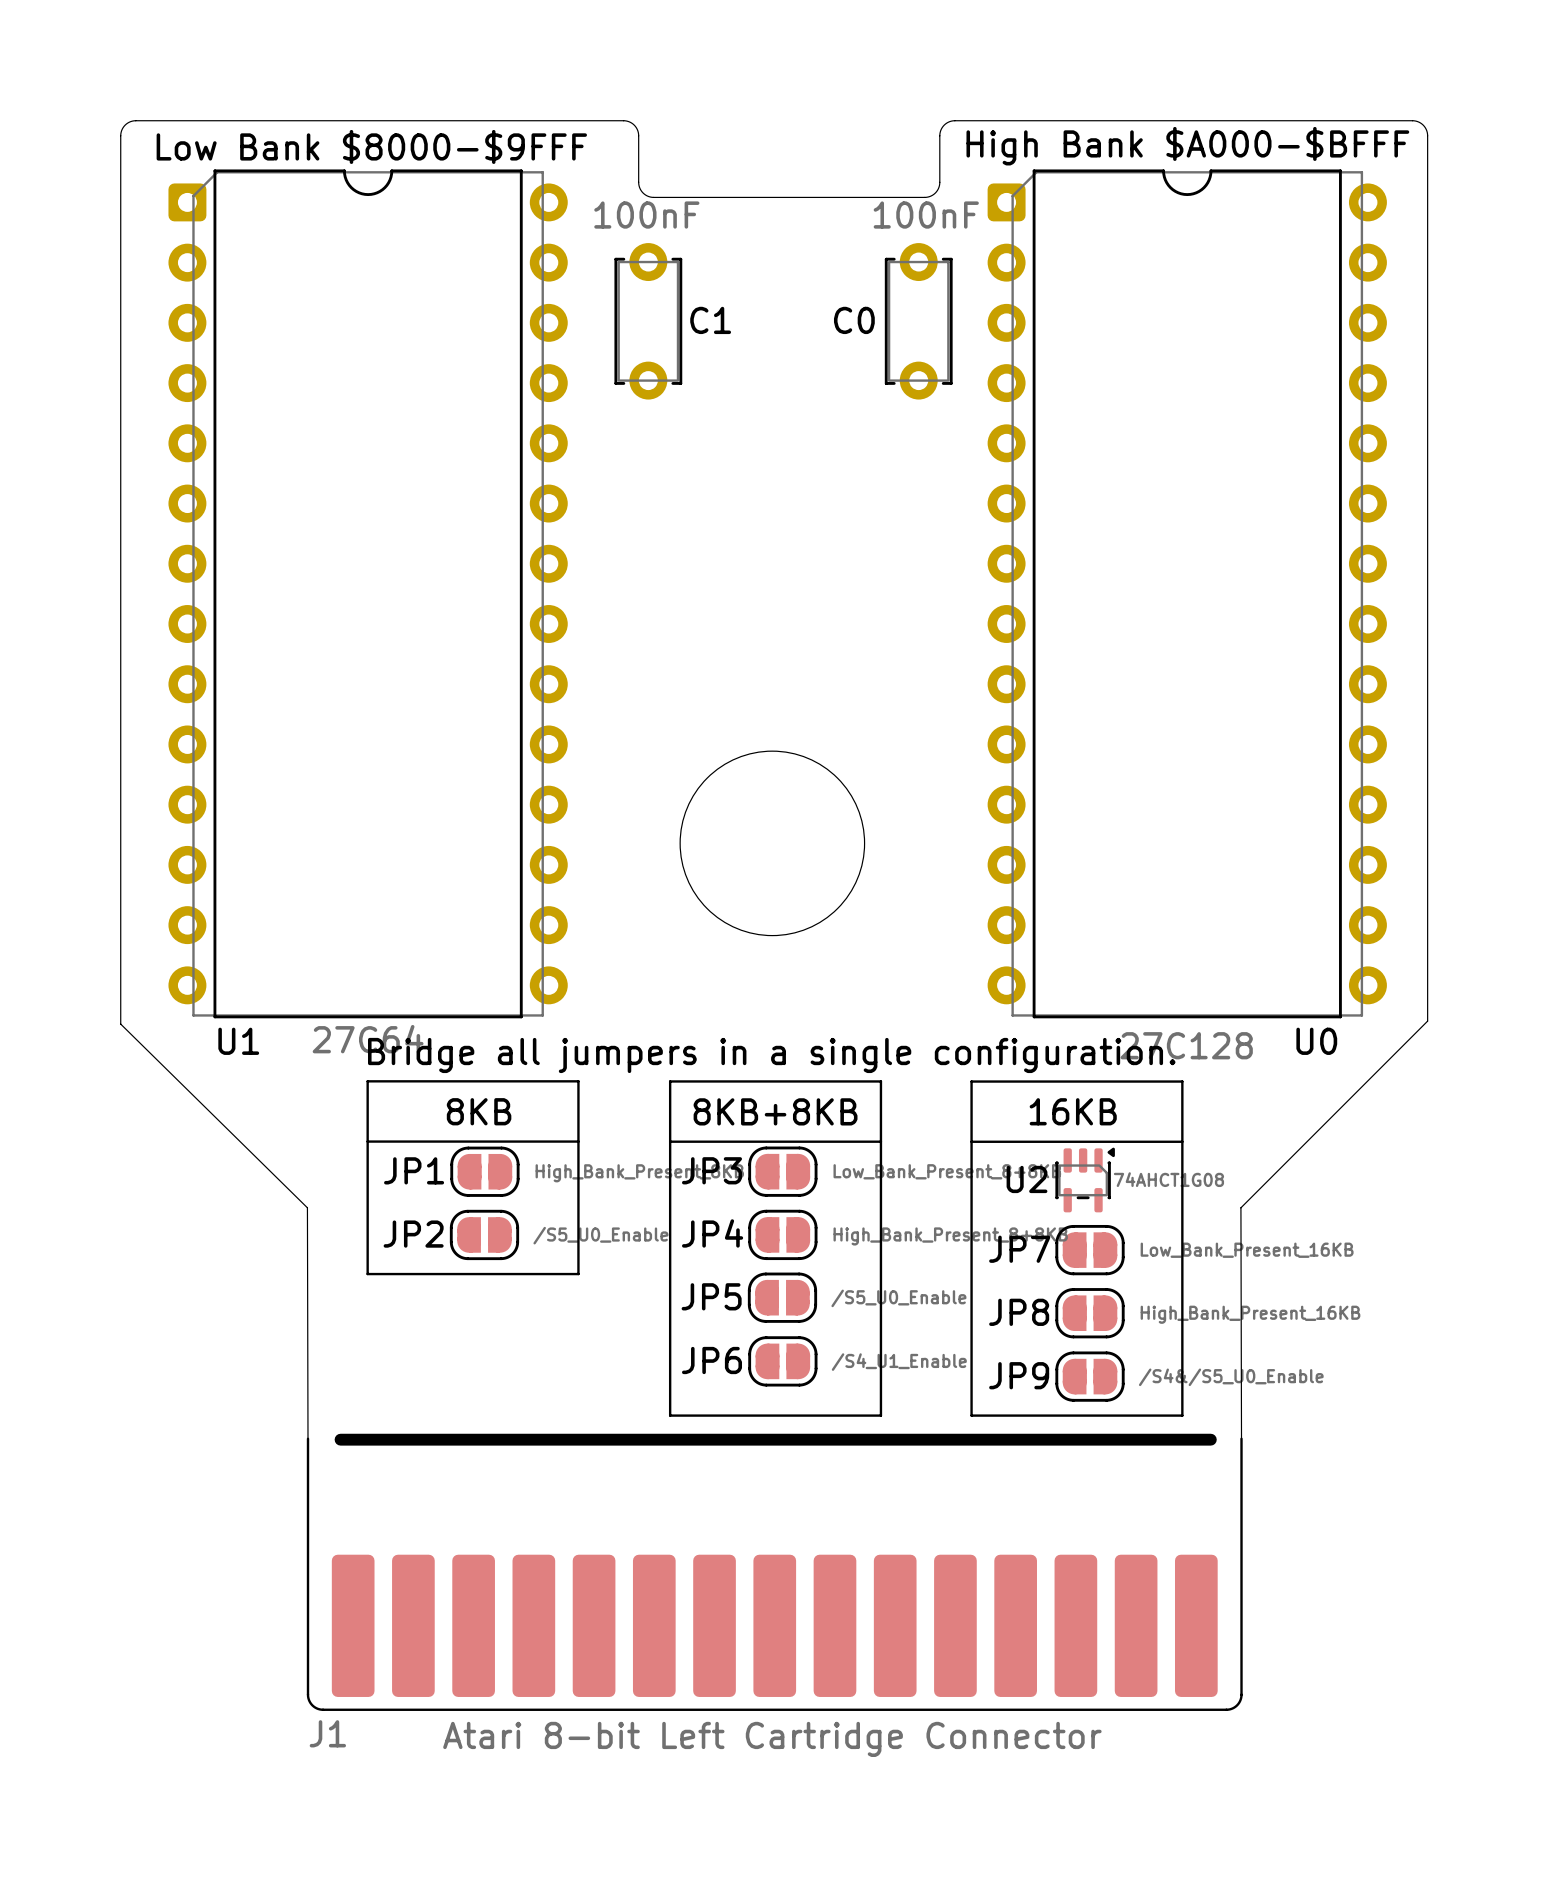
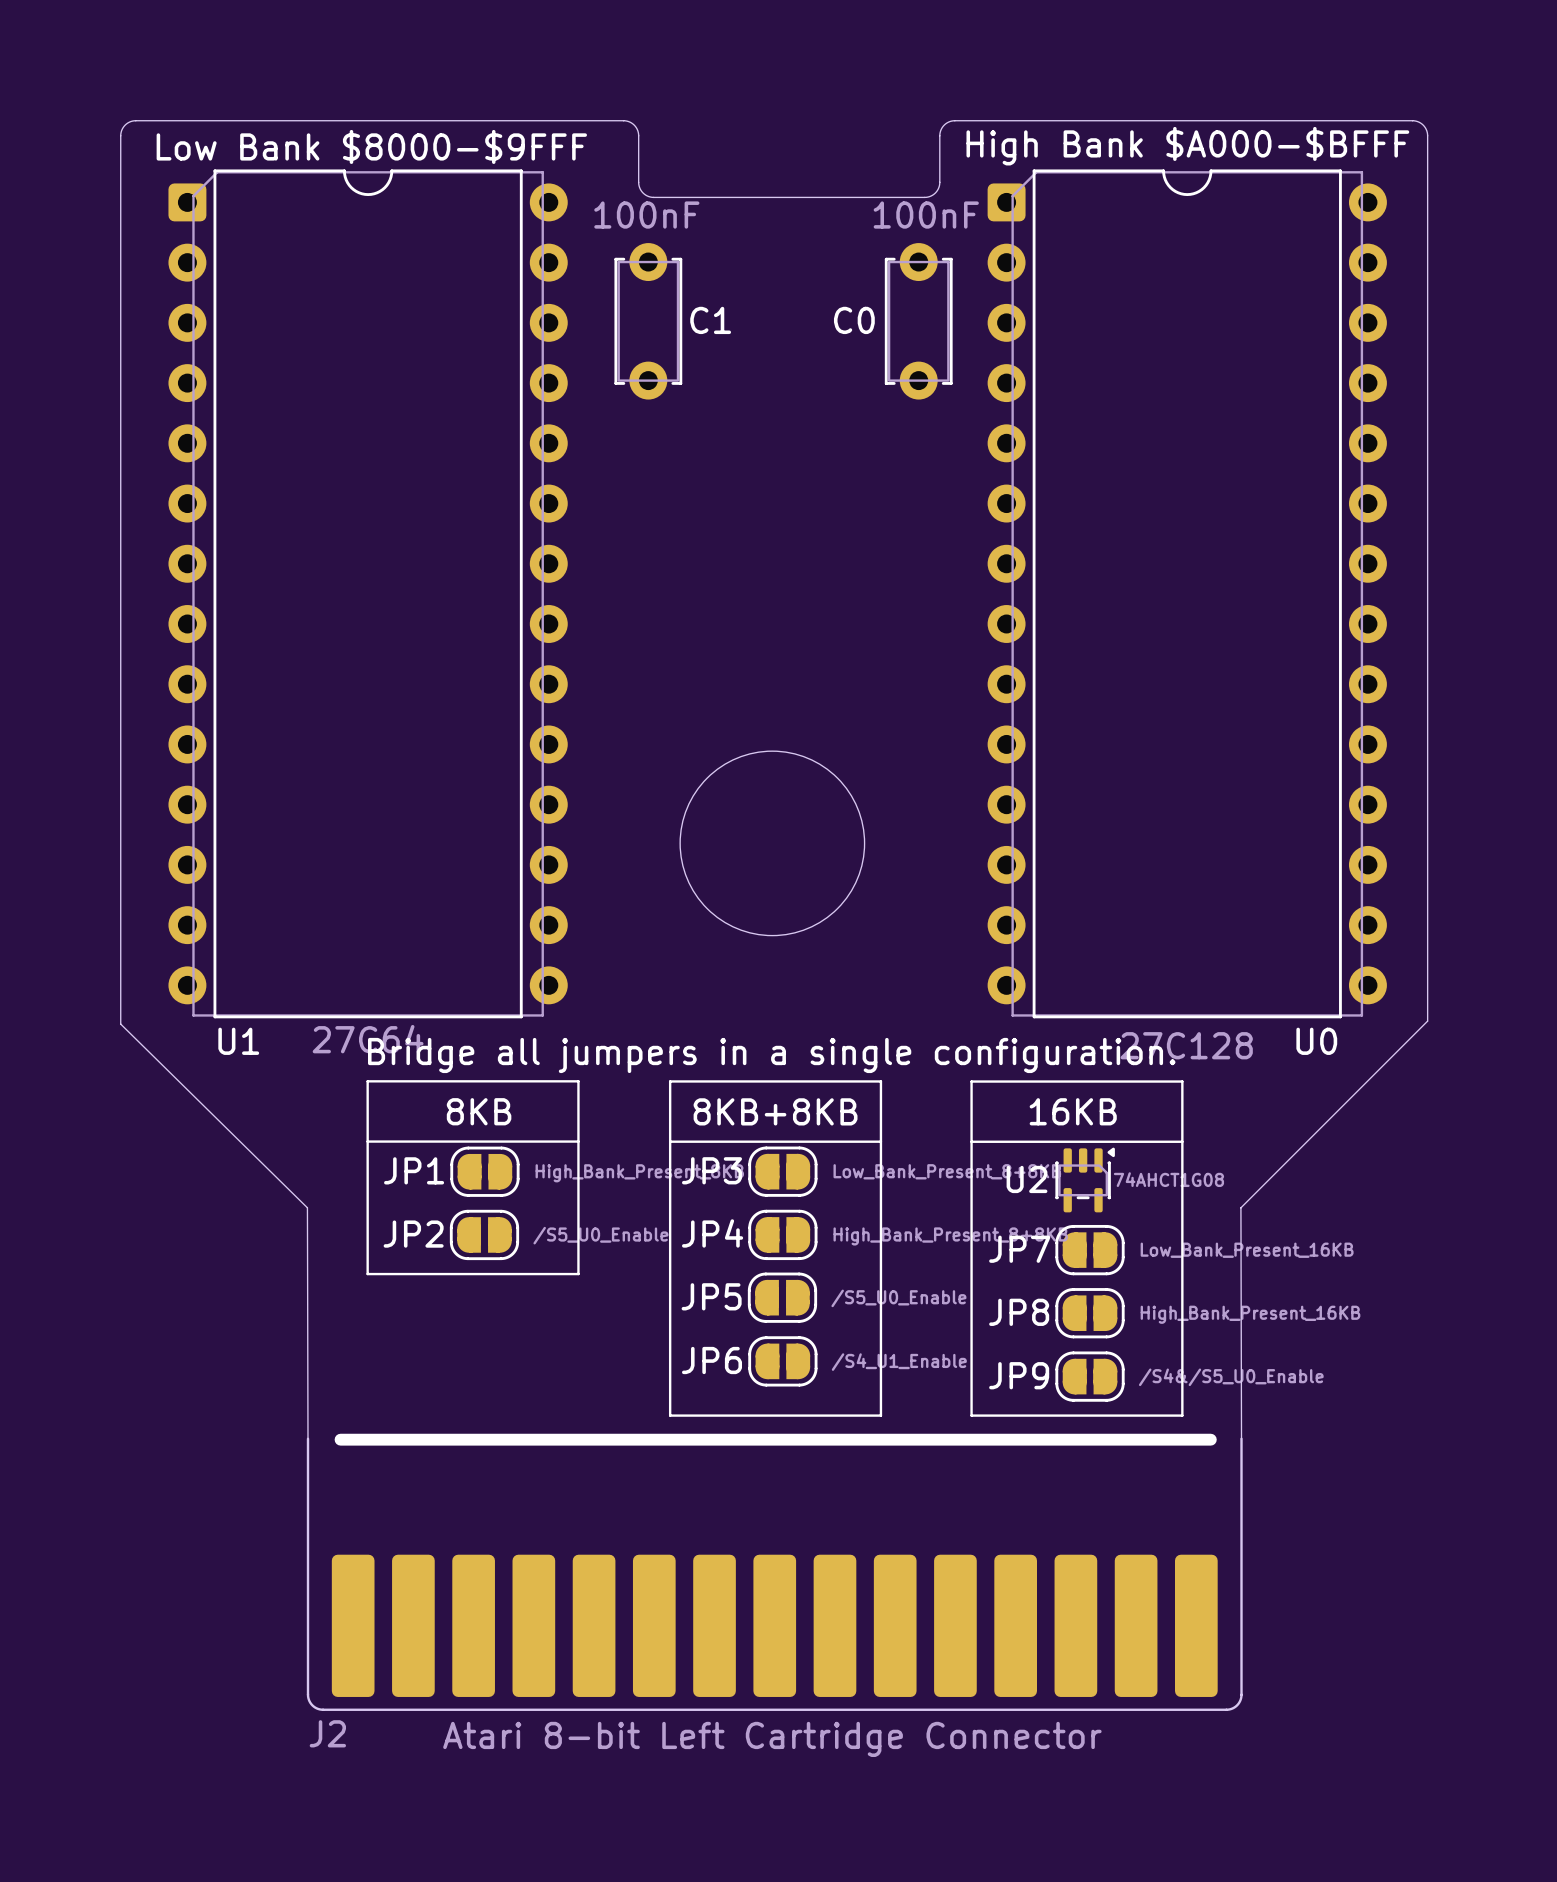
J1 name: J1 (327, 1733) -> J2 (327, 1733)

